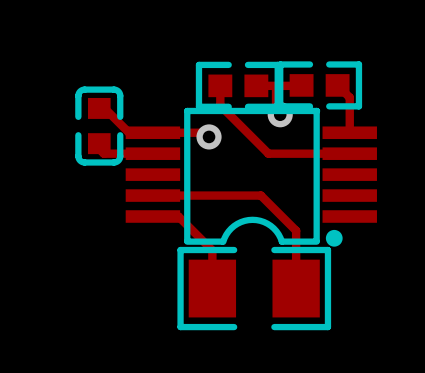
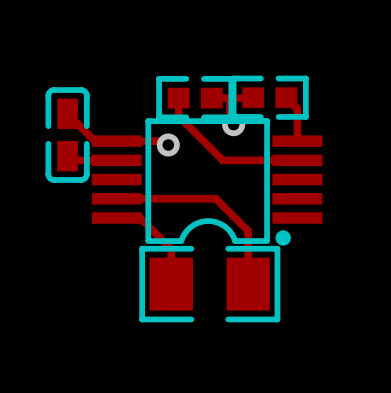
part footprint: [75, 86, 124, 166] -> [45, 87, 90, 183]

